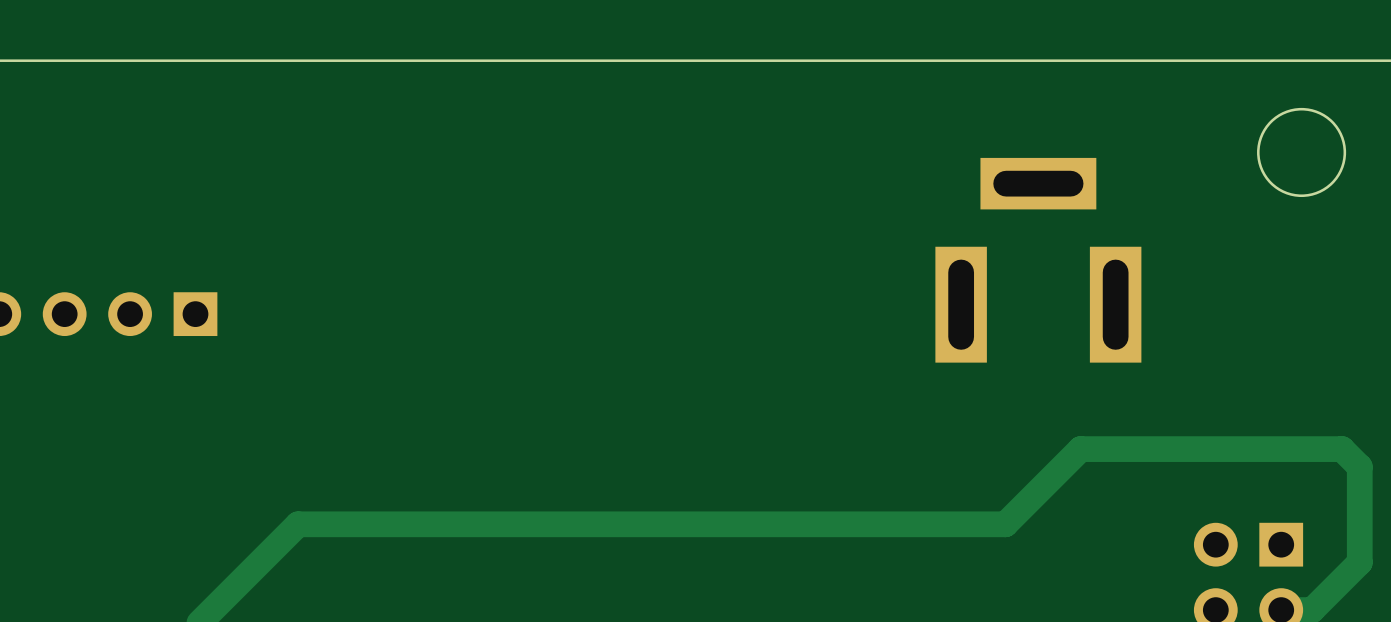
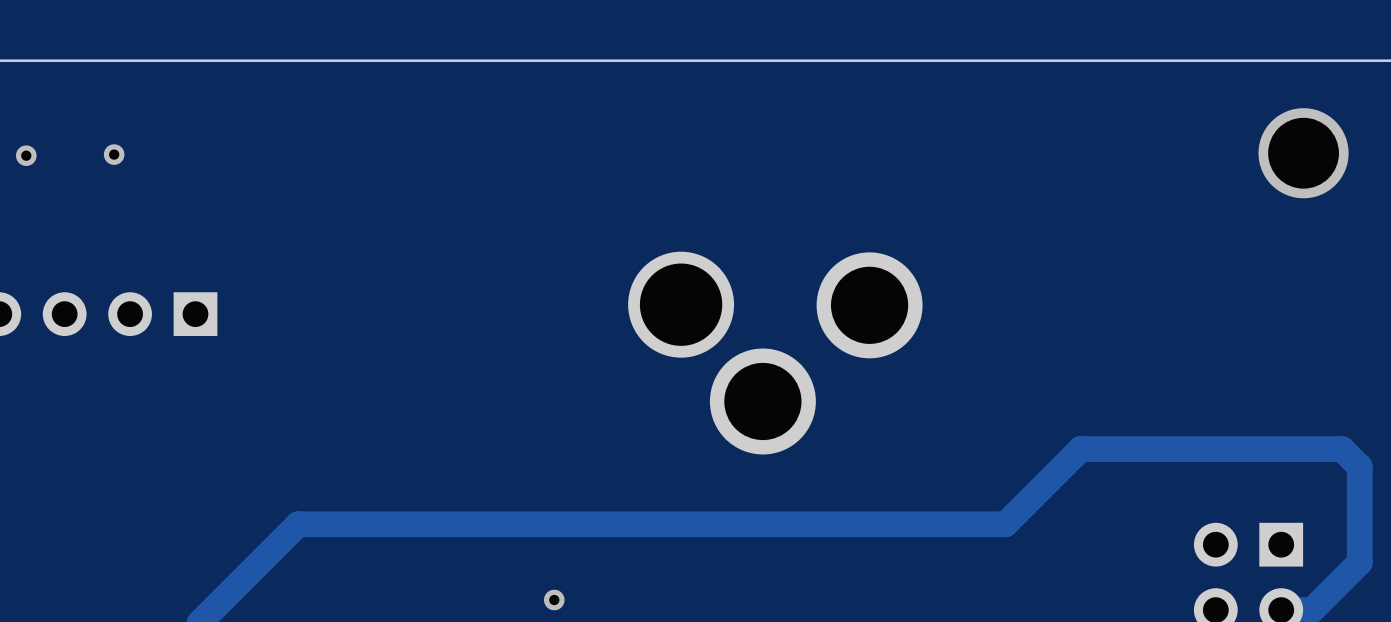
round board edge: [1257, 107, 1347, 198] -> none
via: none -> (1303, 153)
via: none -> (114, 154)
via: none -> (26, 155)
part: (1038, 260) -> none
part: none -> (775, 353)
via: none -> (554, 600)

